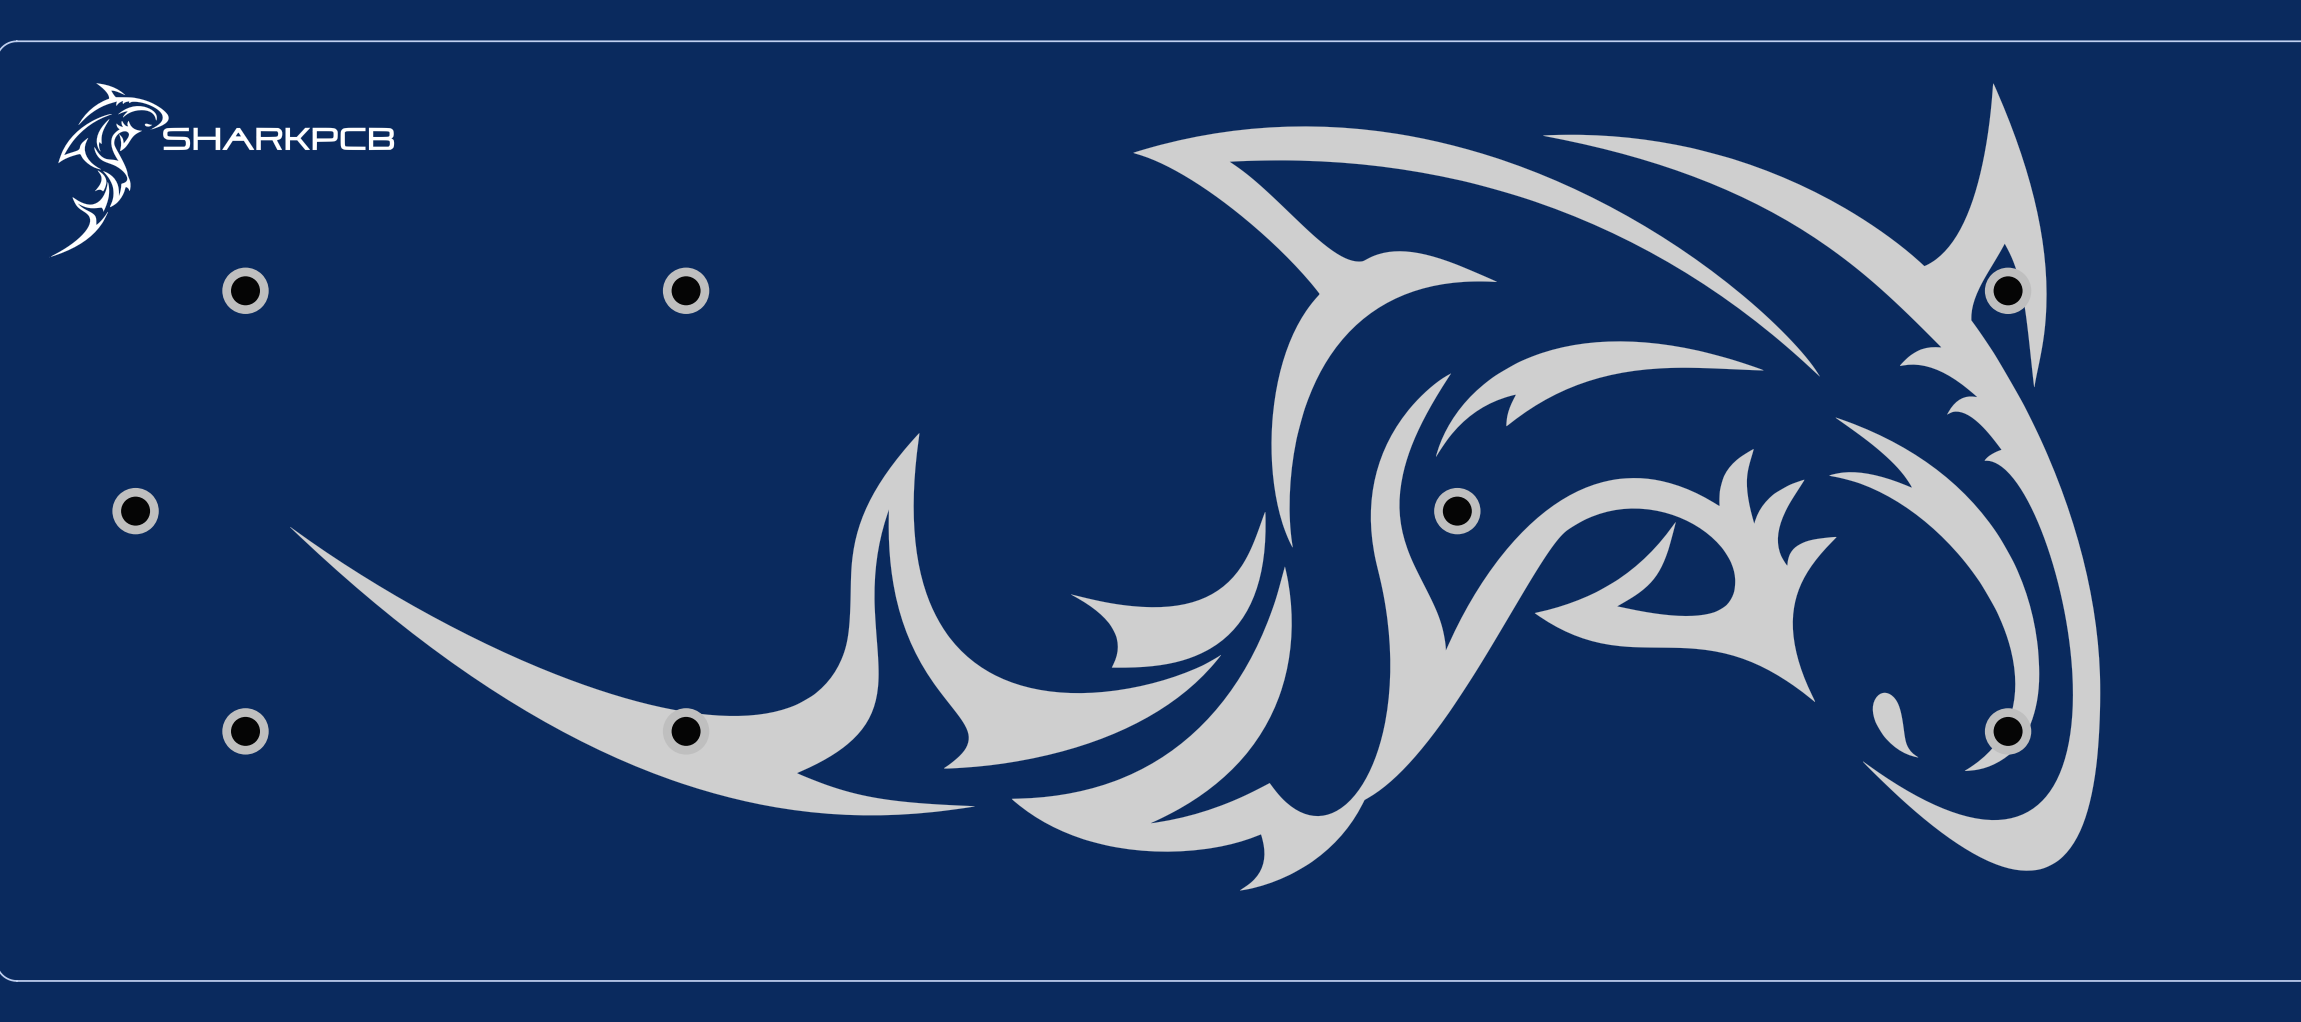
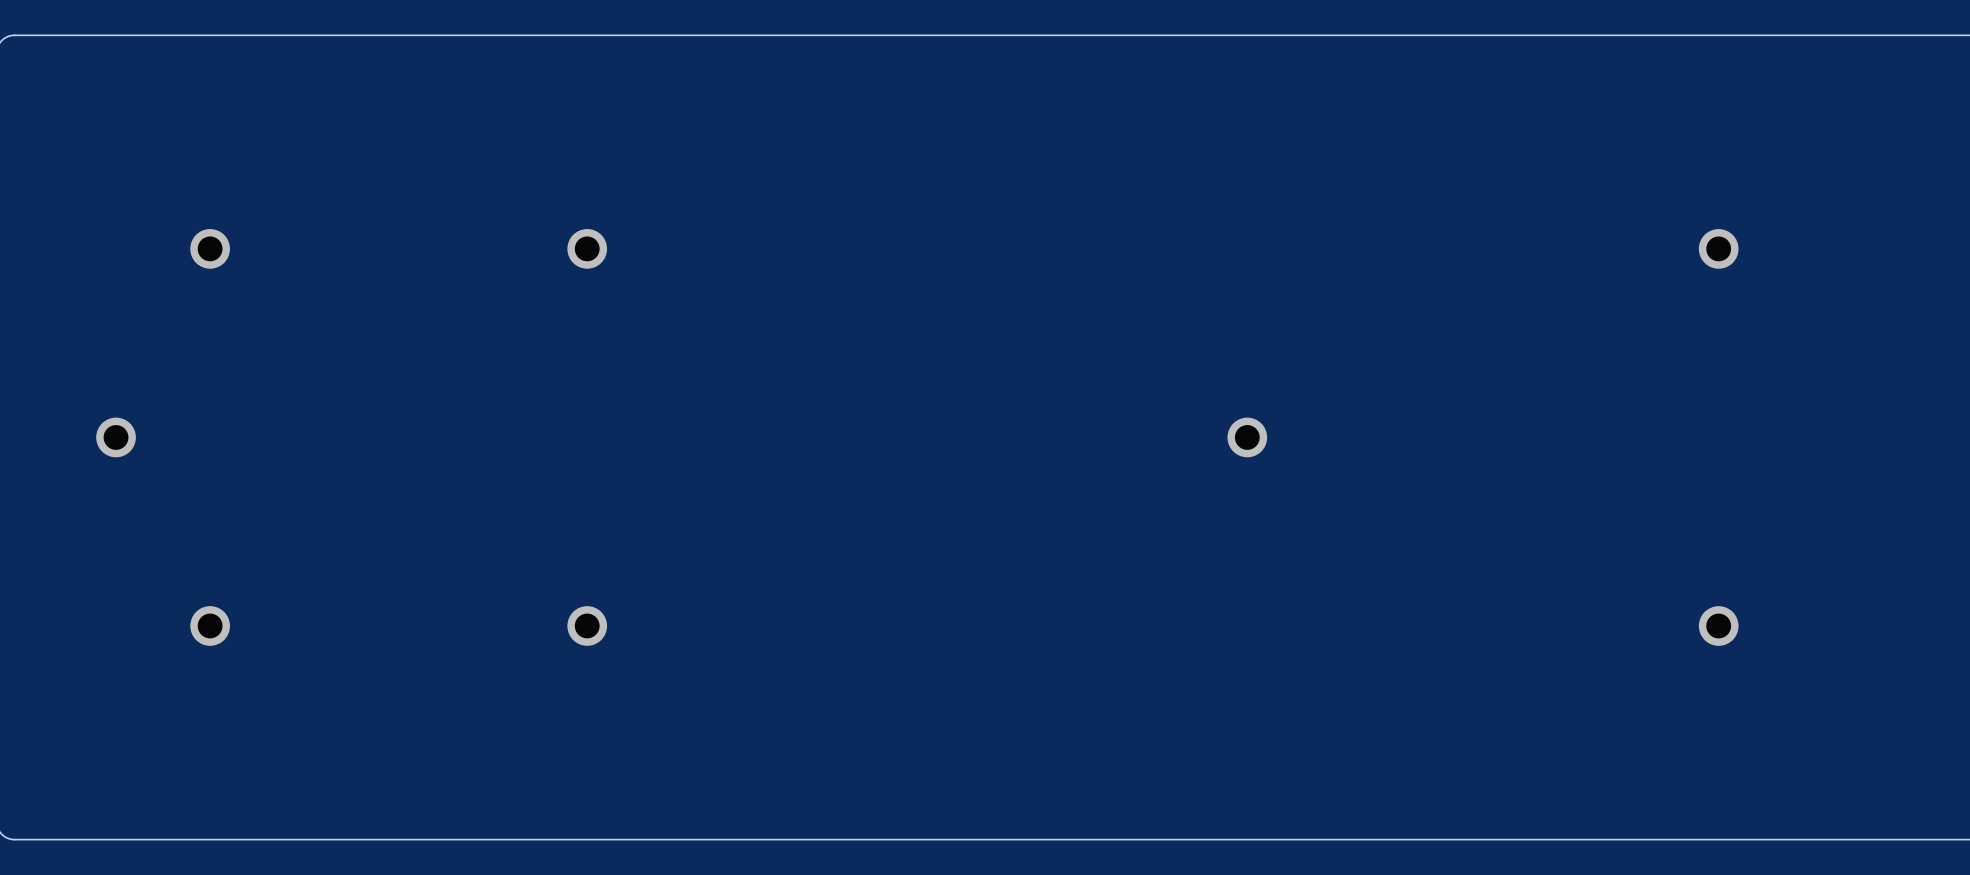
drawing: [49, 83, 395, 258] -> none
part: (1195, 487) -> none

